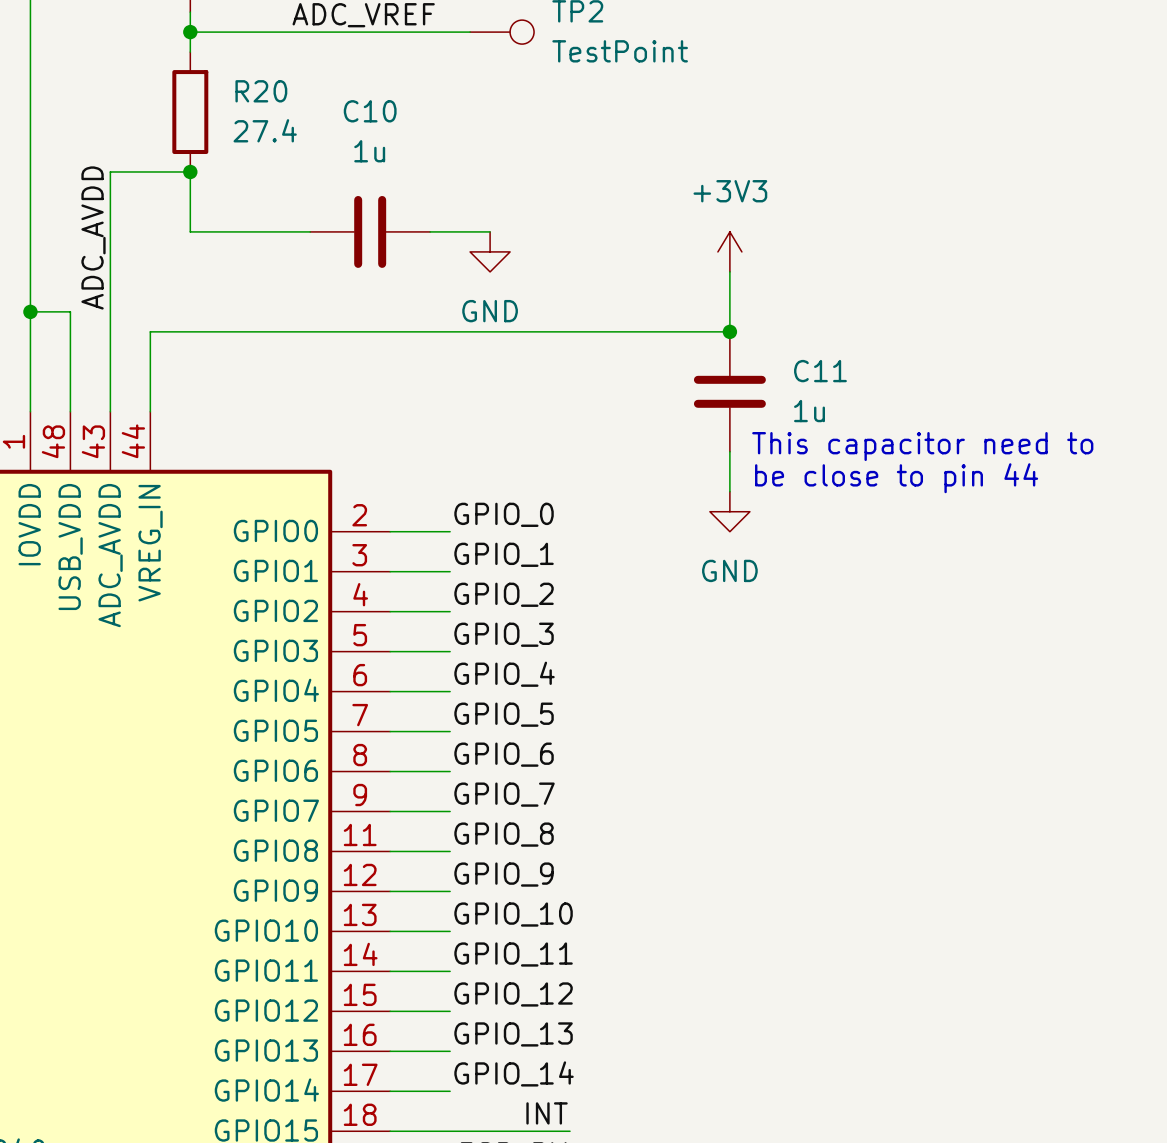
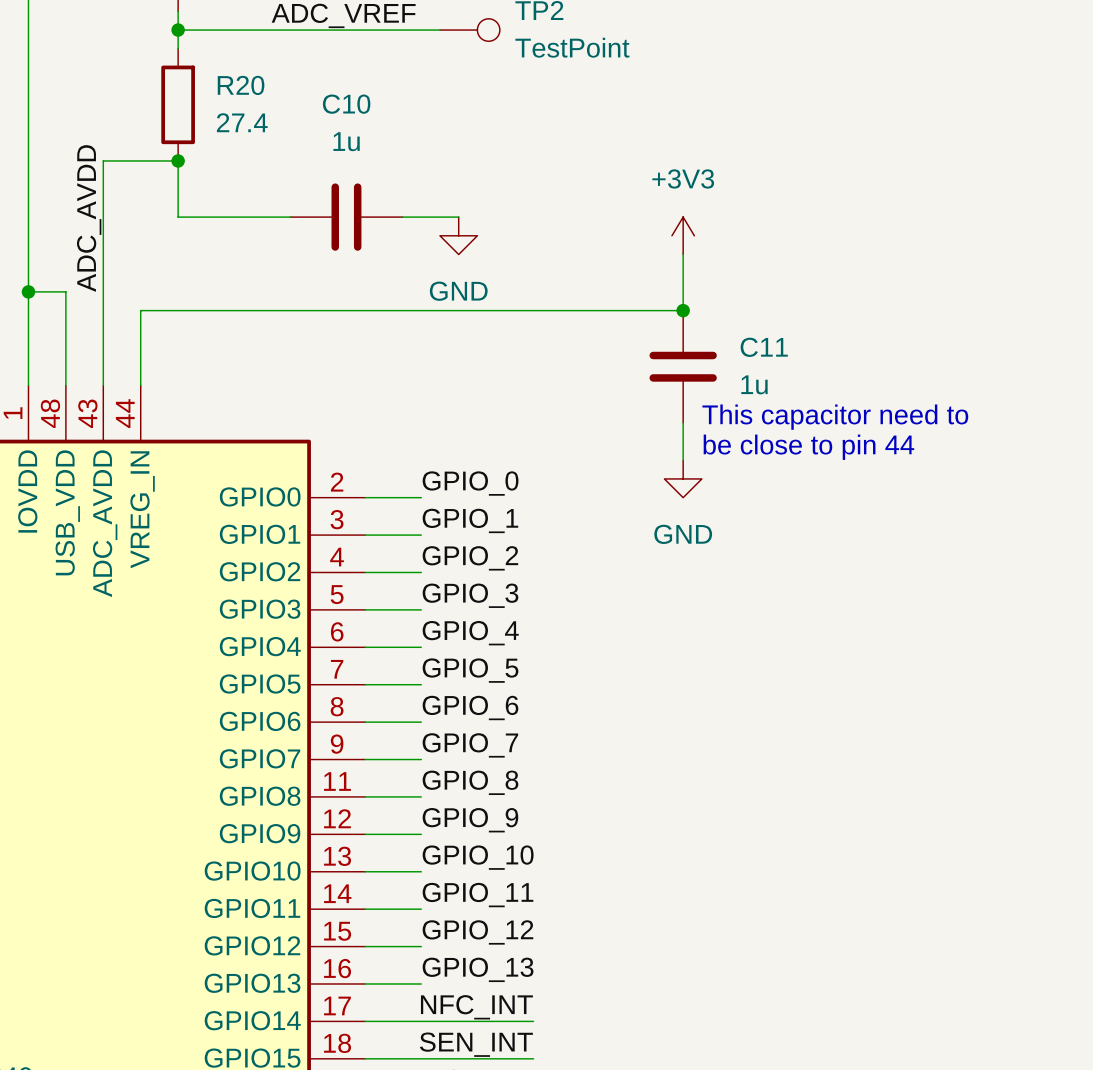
label: GPIO_14 (514, 1073) -> none
label: none -> NFC_INT (476, 1007)
wire: none -> (421, 1021) (533, 1021)
label: INT (547, 1113) -> SEN_INT (476, 1044)

